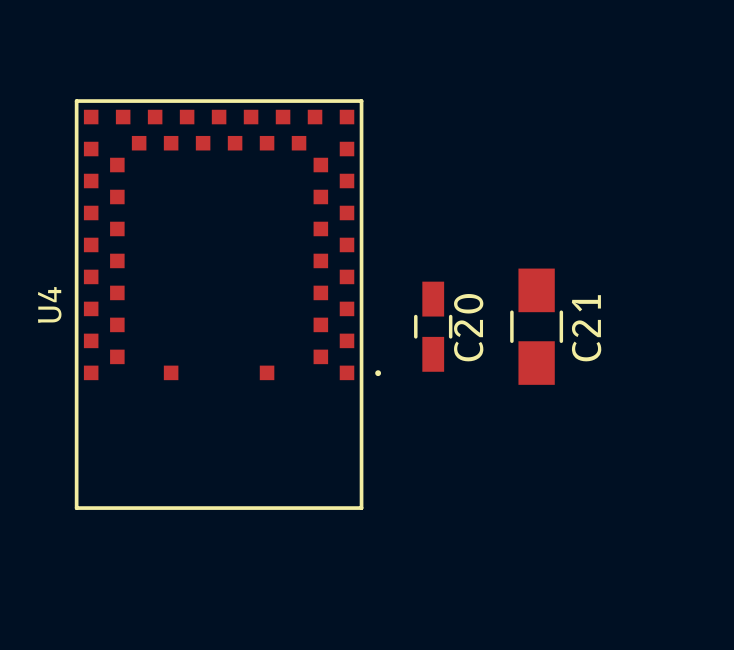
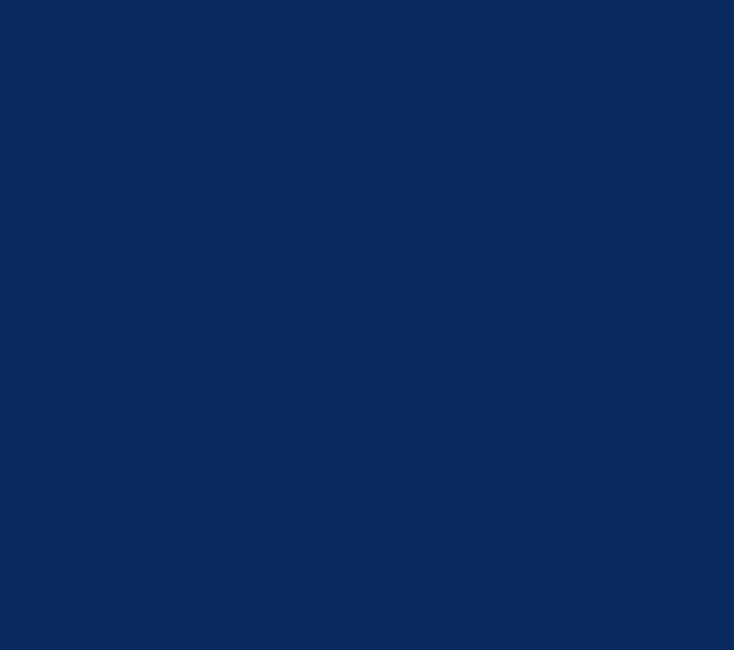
U4: (227, 304) -> none
C20: (433, 326) -> none
C21: (536, 326) -> none

